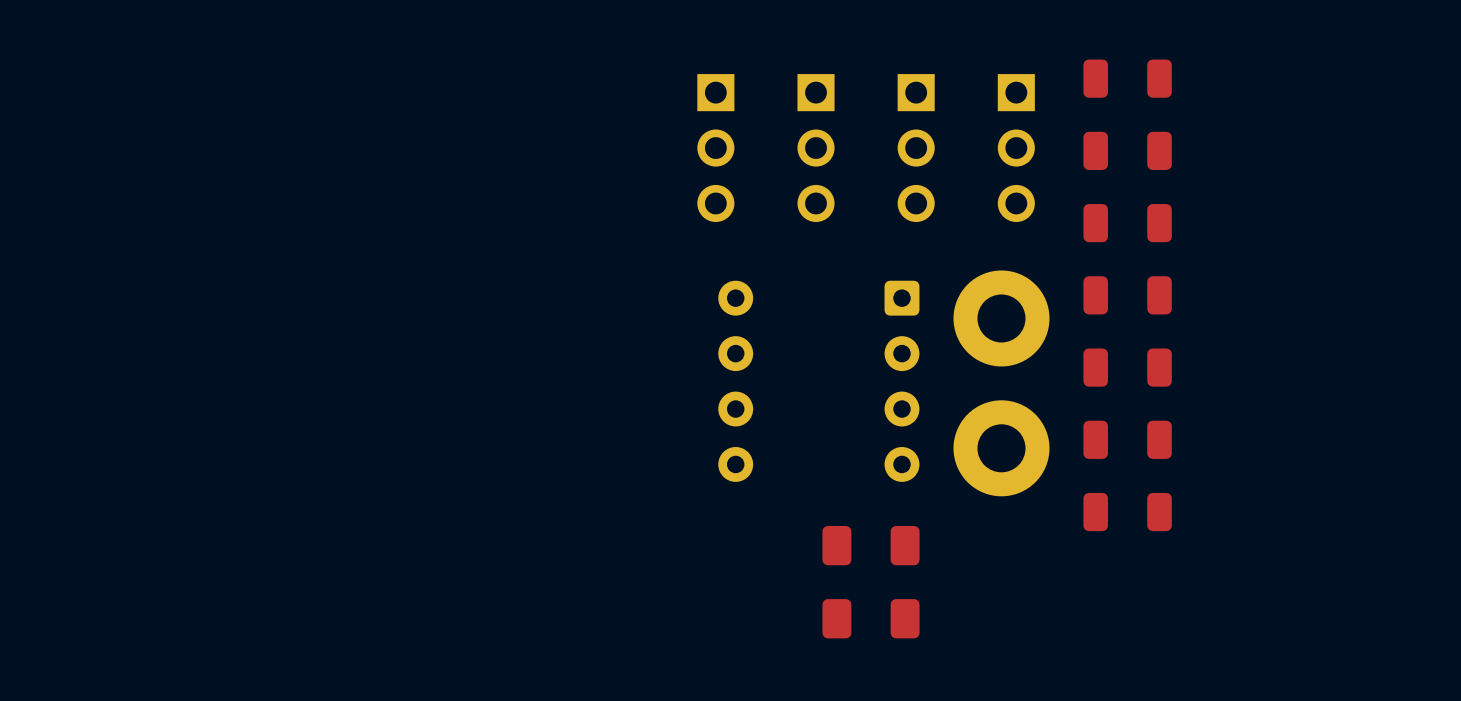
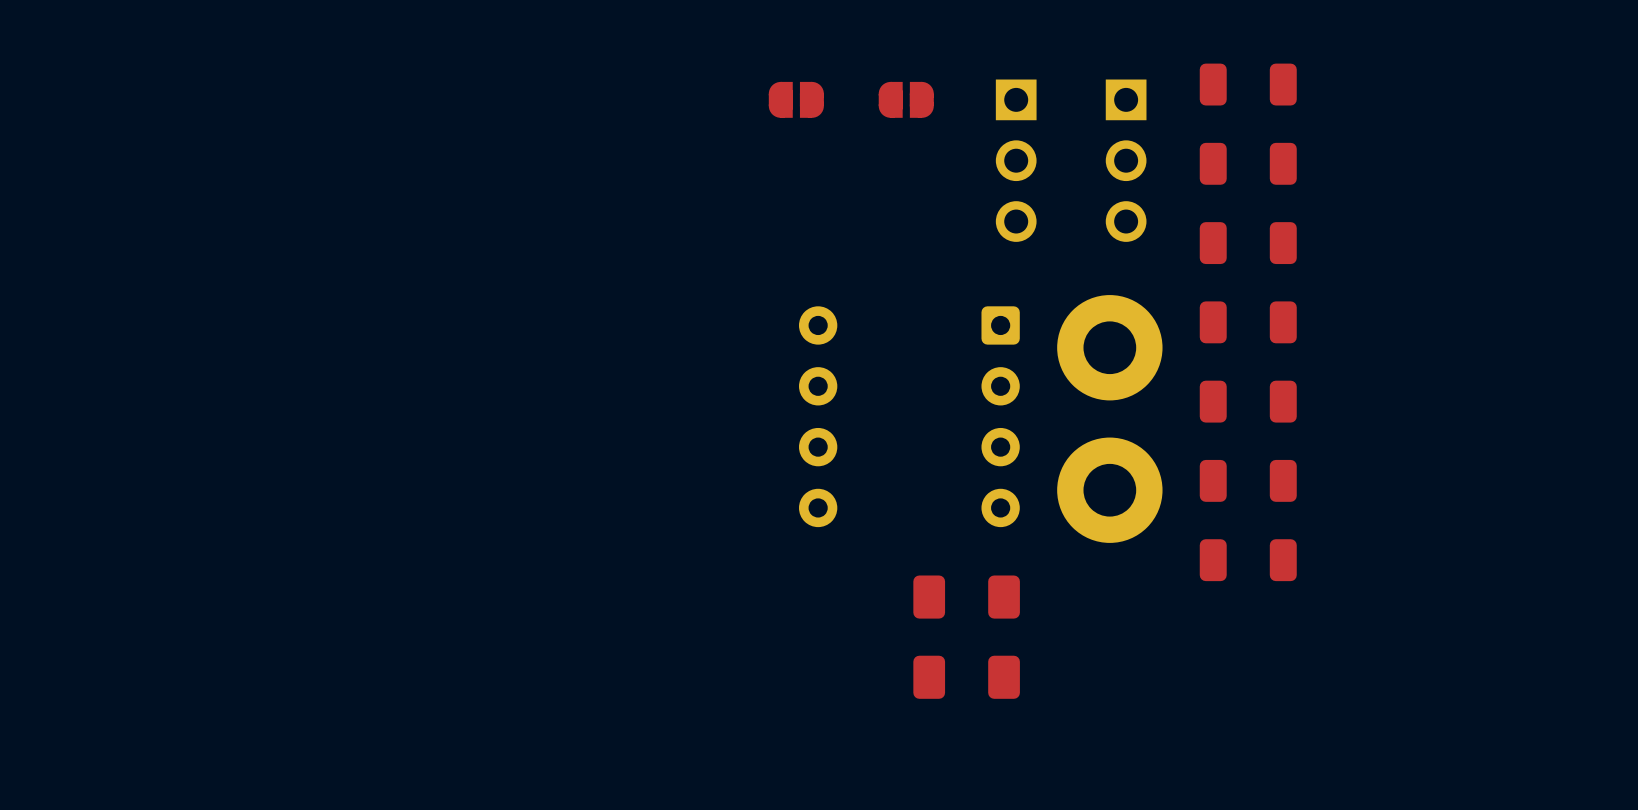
part: none -> (796, 99)
part: none -> (906, 99)
part: (715, 148) -> none
part: (816, 148) -> none

